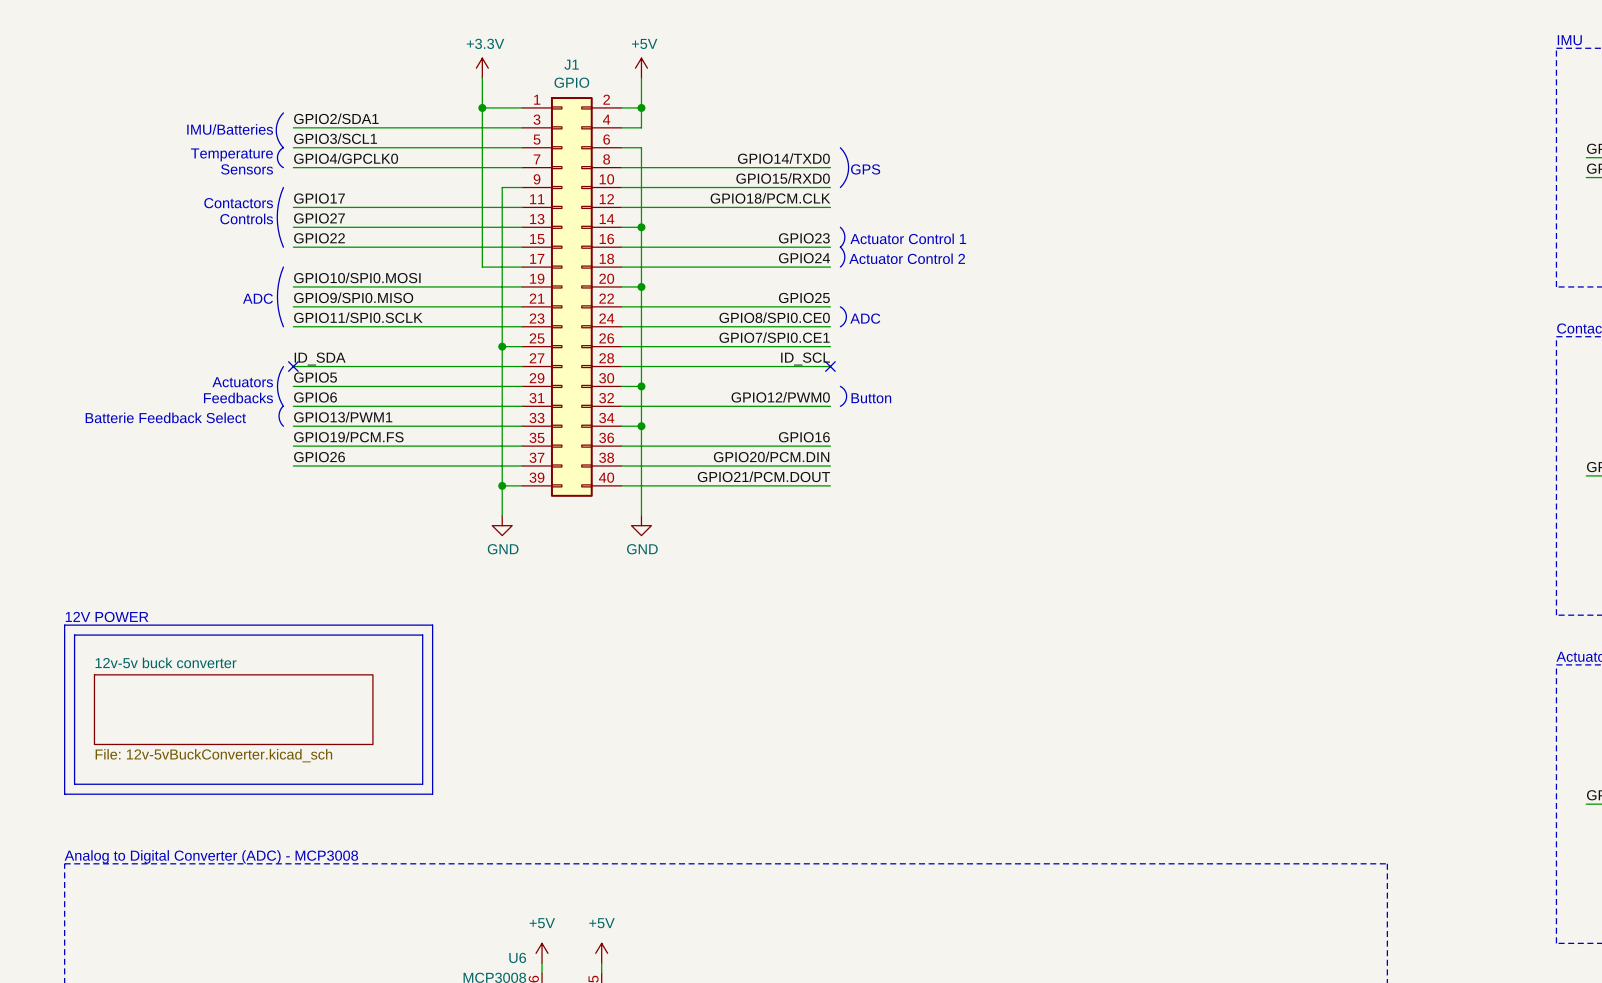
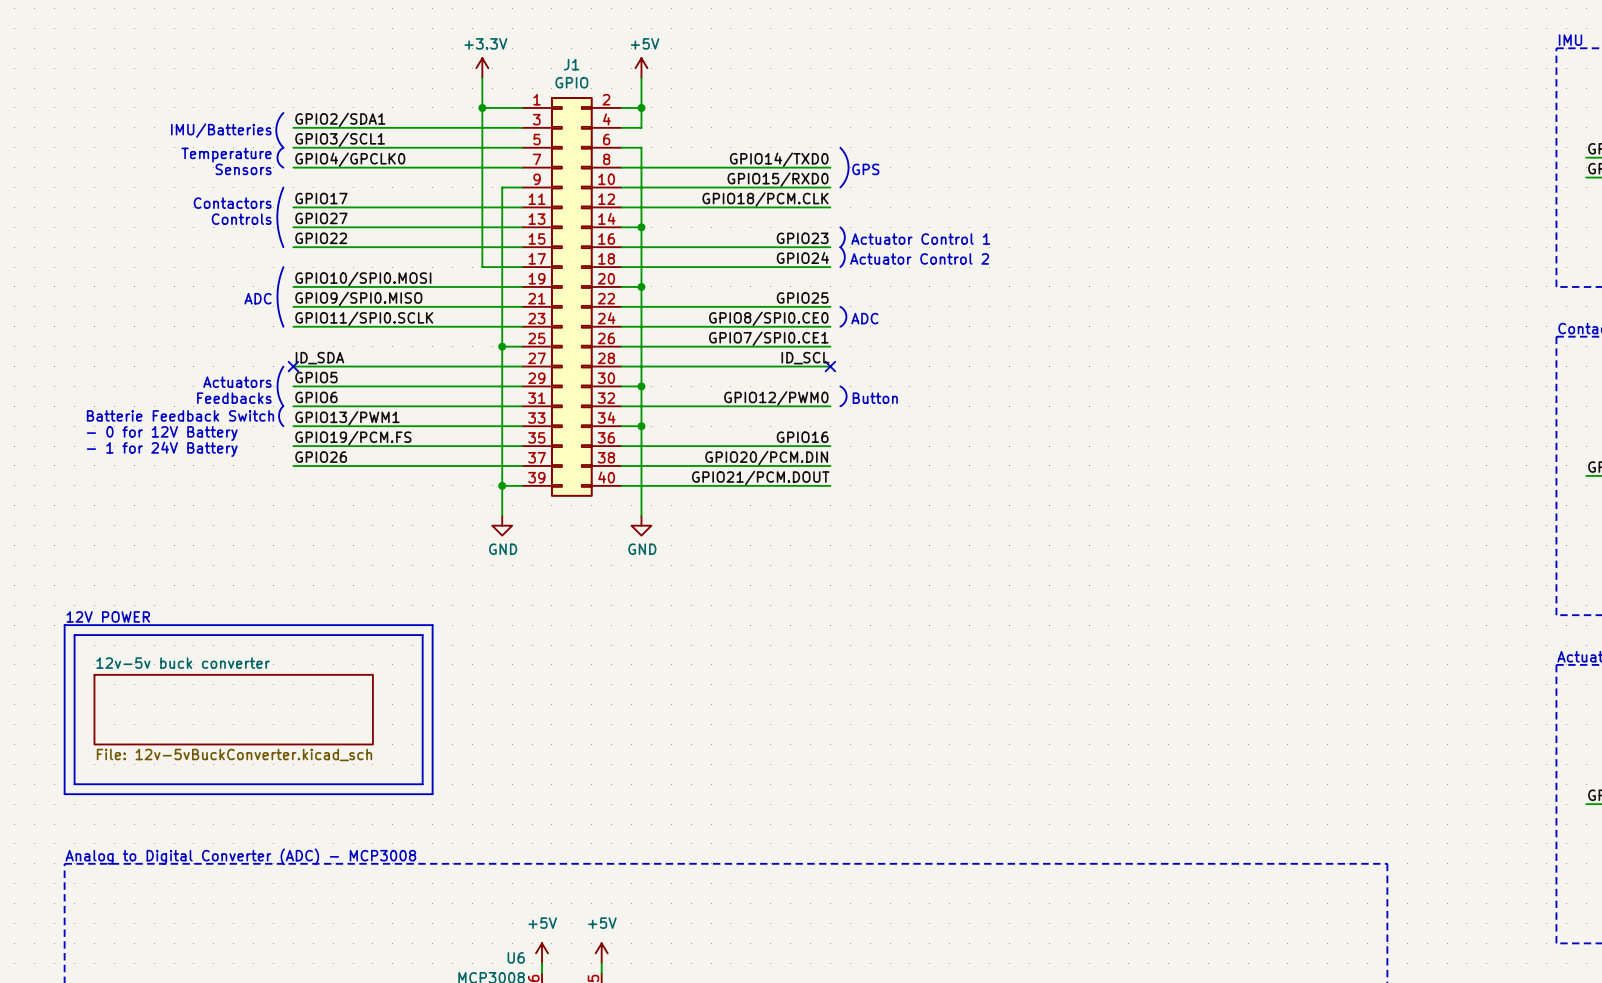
text: Batterie Feedback Select (165, 417) -> Batterie Feedback Switch (180, 415)
text: none -> - 0 for 12V Battery (162, 433)
text: none -> - 1 for 24V Battery (162, 449)

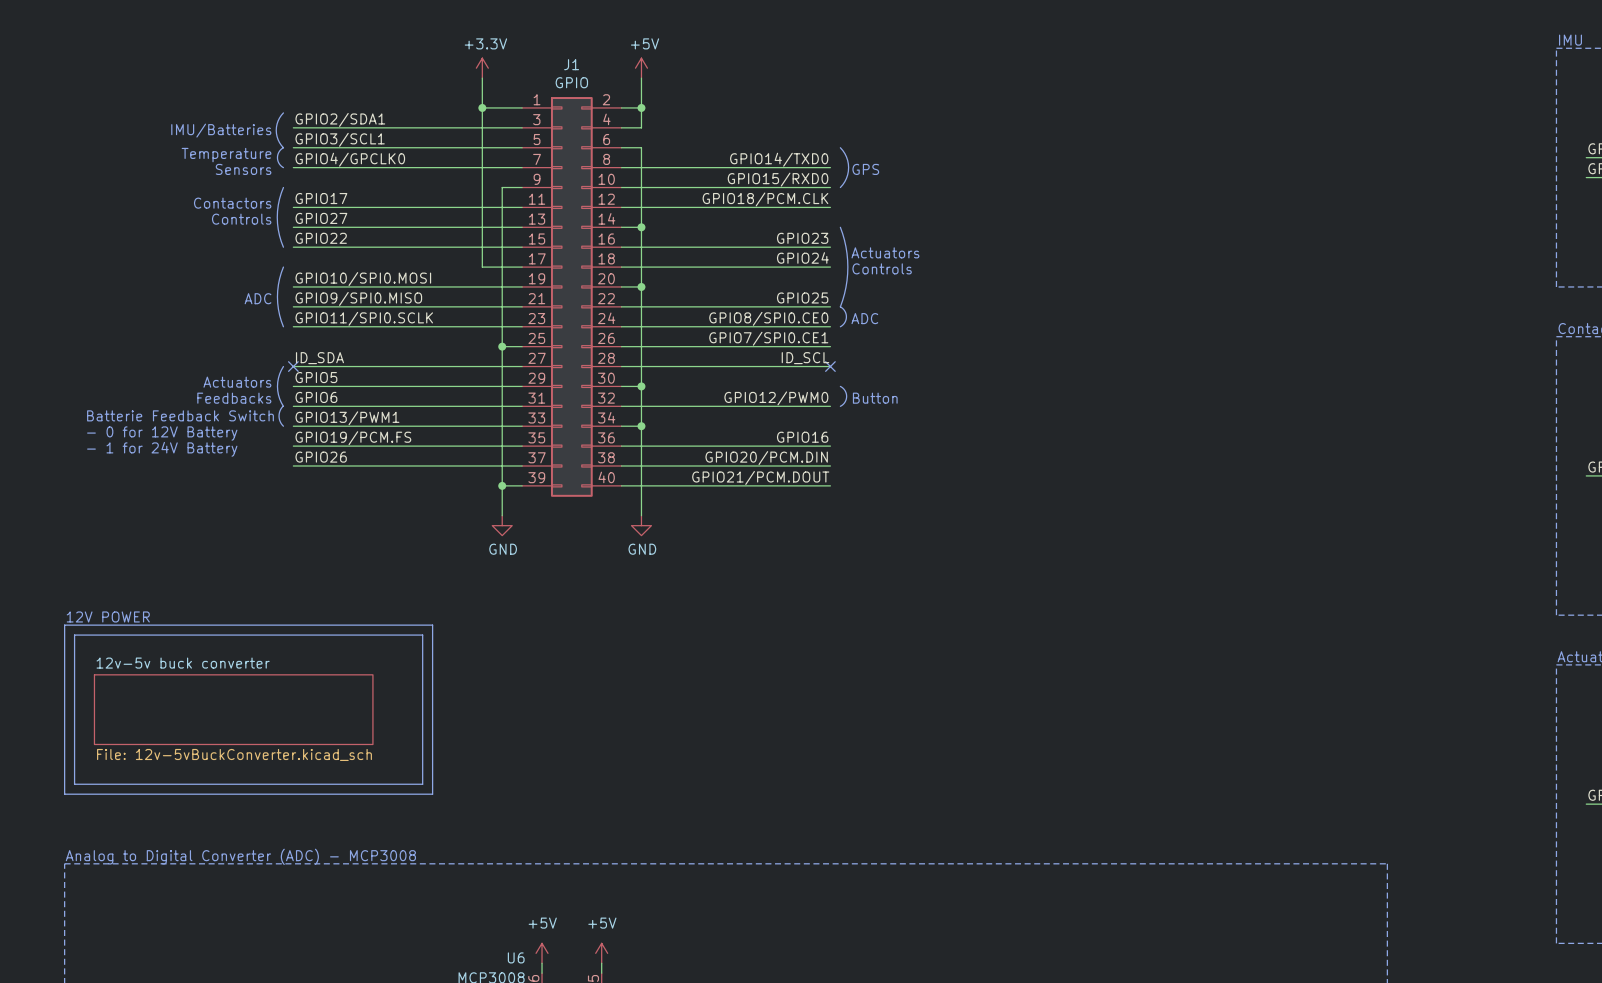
line: (840, 227) (844, 237) (840, 247) (843, 252) (844, 258) (840, 267) -> (840, 227) (845, 246) (847, 267) (845, 287) (840, 306)
text: Actuator Control 1 (920, 239) -> none
text: none -> Actuators (885, 252)
text: Actuator Control 2 (919, 258) -> none
text: none -> Controls (882, 268)

